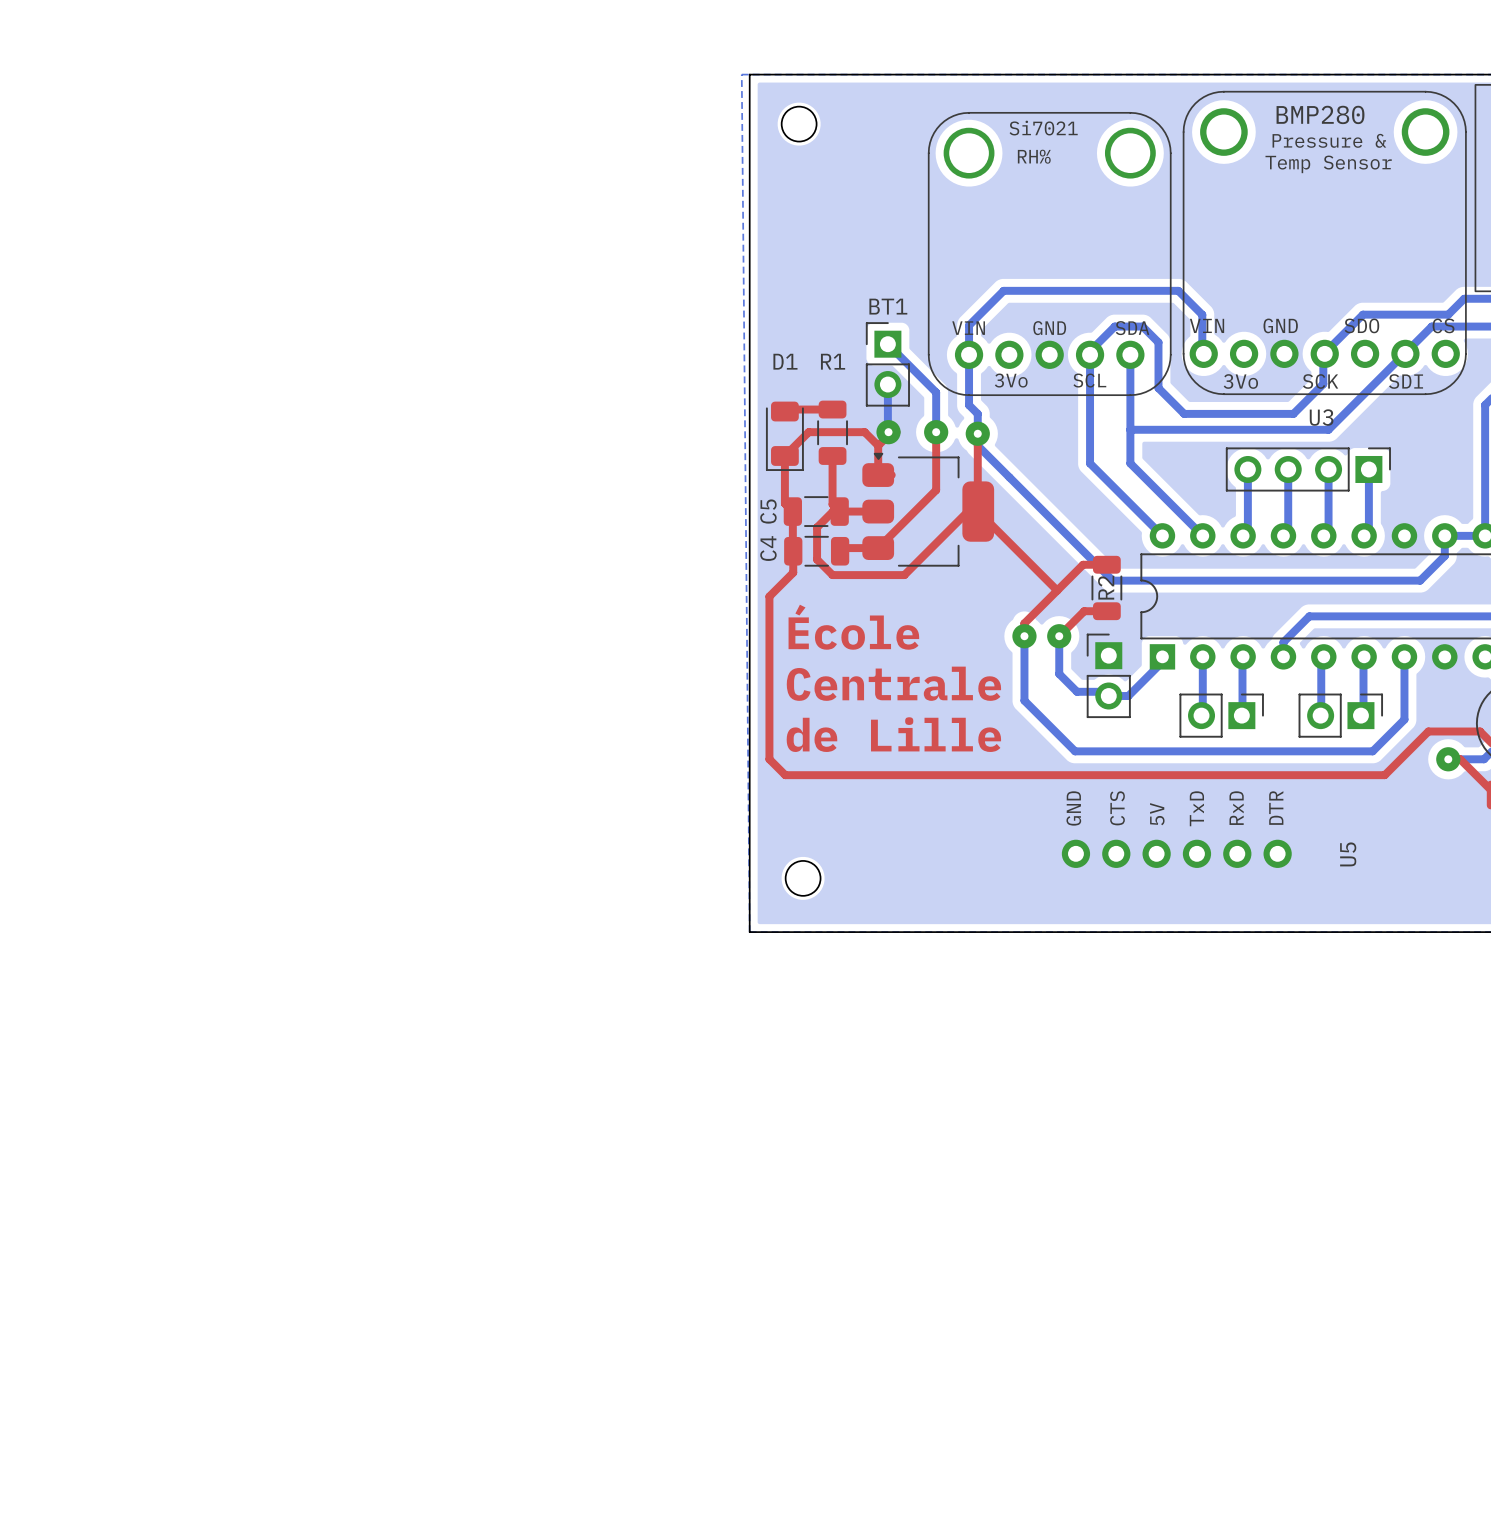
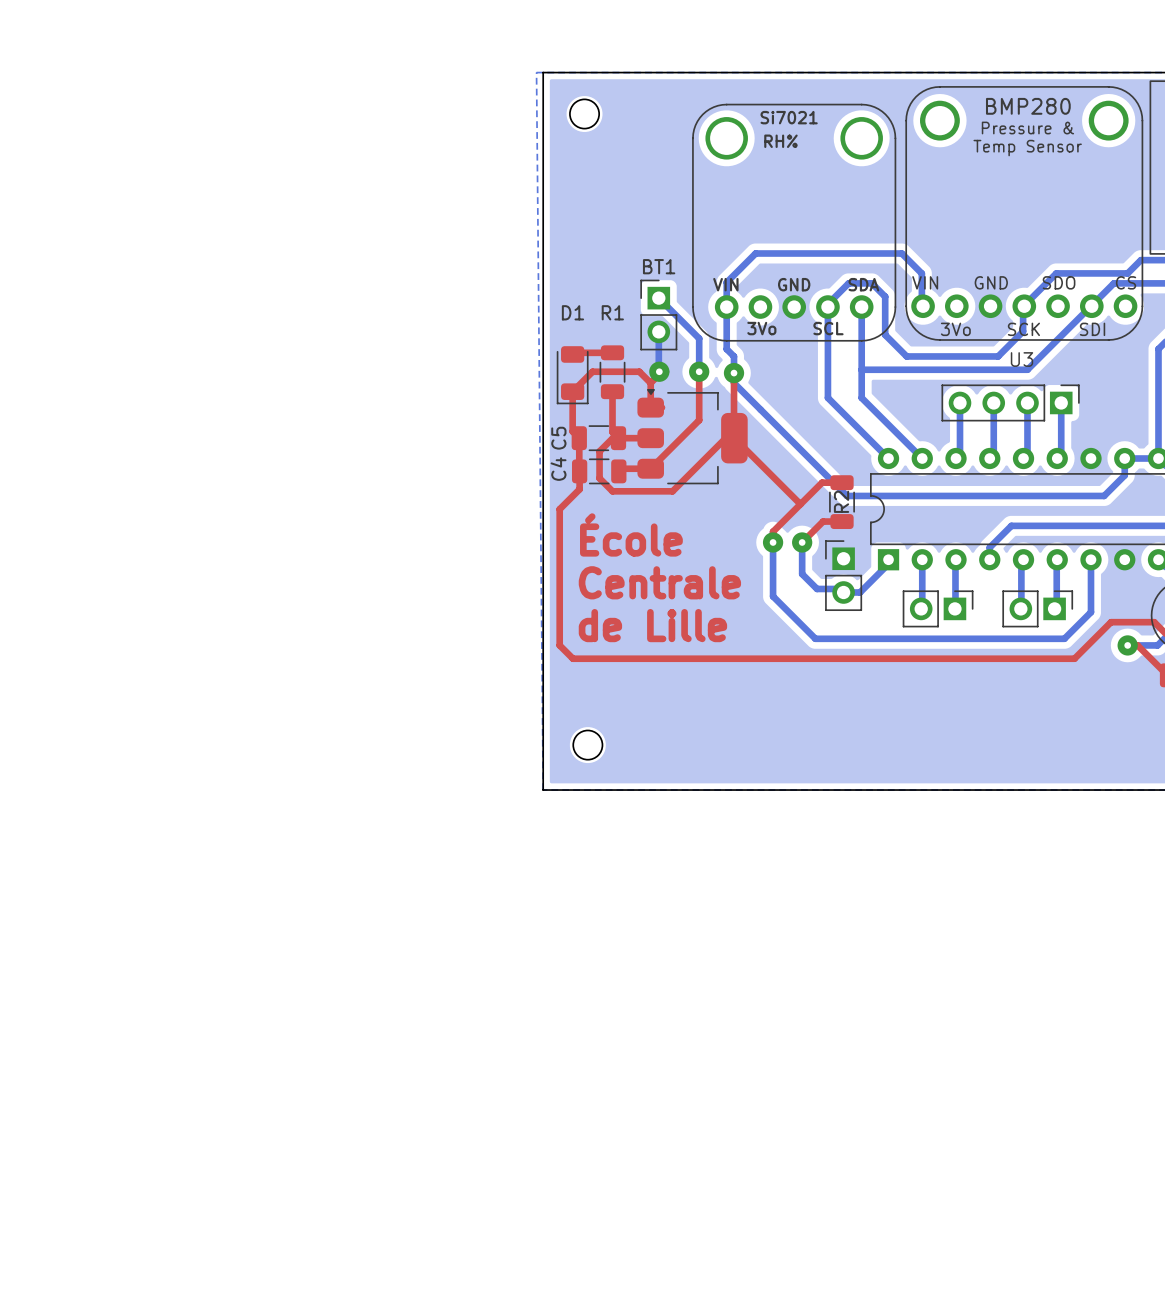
U5: (1176, 853) -> none

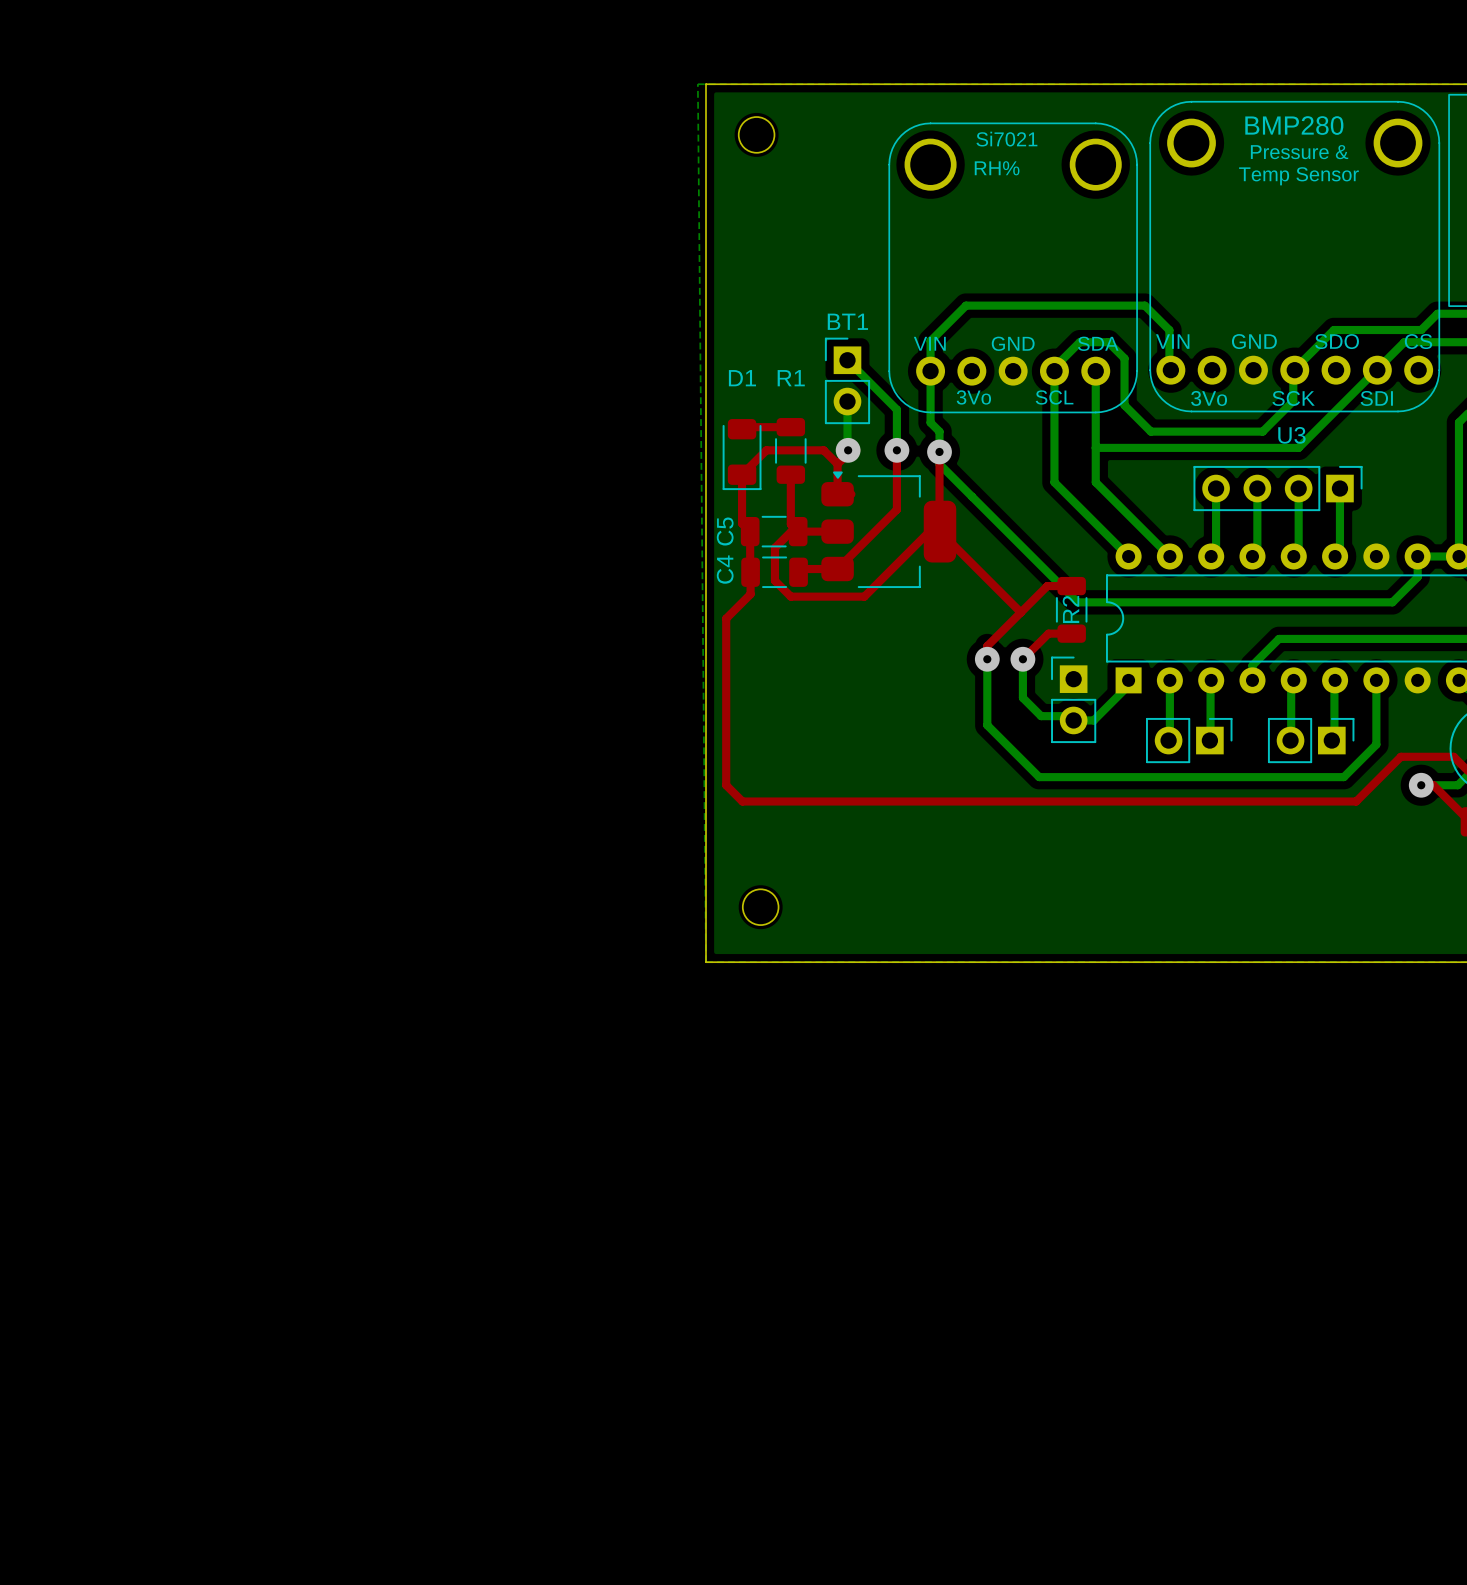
text: École (631, 534) -> none
text: Centrale (659, 582) -> none
text: de Lille (652, 625) -> none

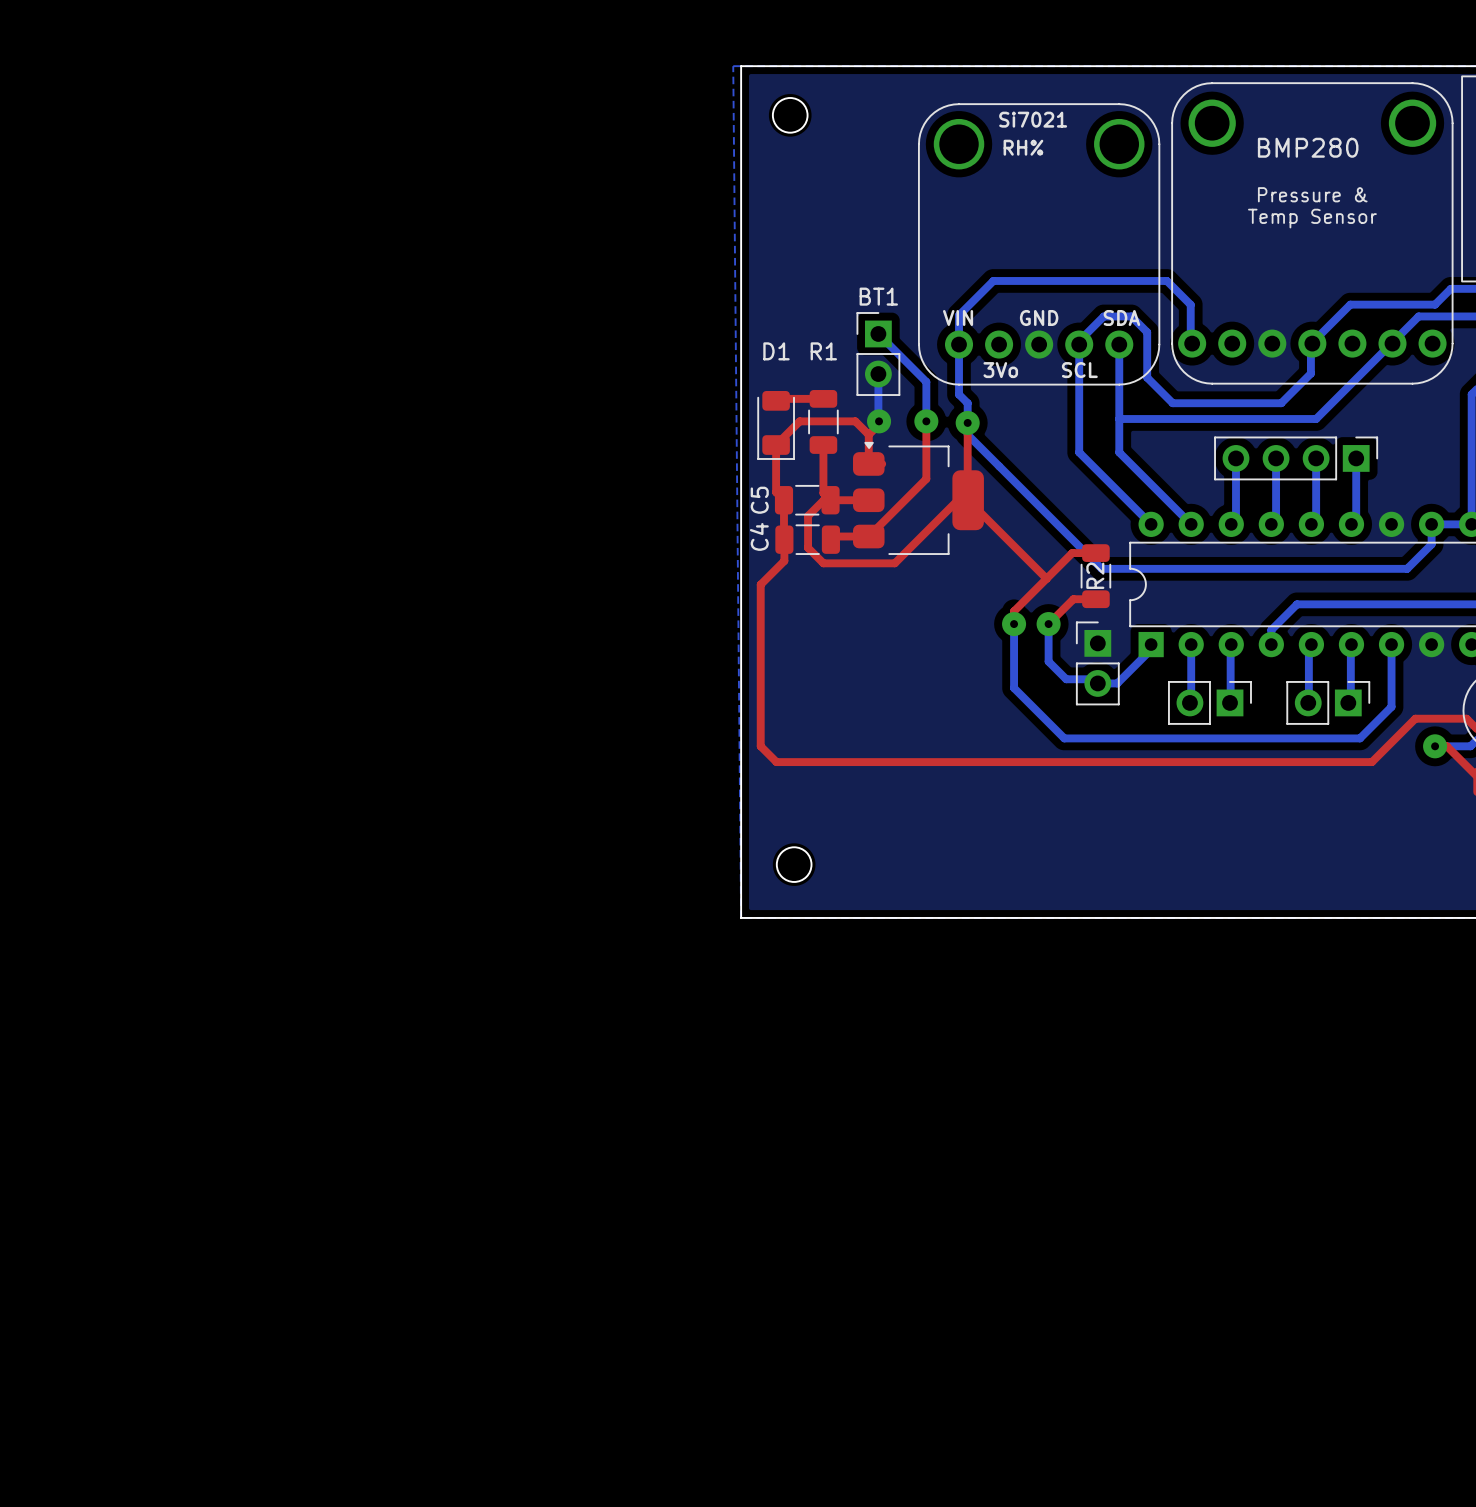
U3 footprint: [1149, 101, 1440, 412] -> [1171, 82, 1453, 385]
U3 name: U3 (1291, 435) -> none

